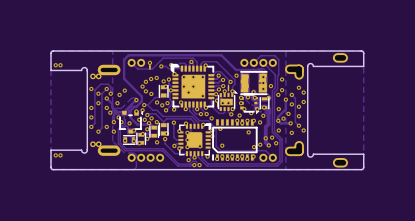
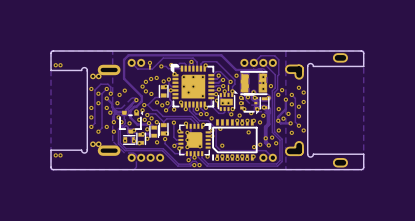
via: (282, 79) -> none

